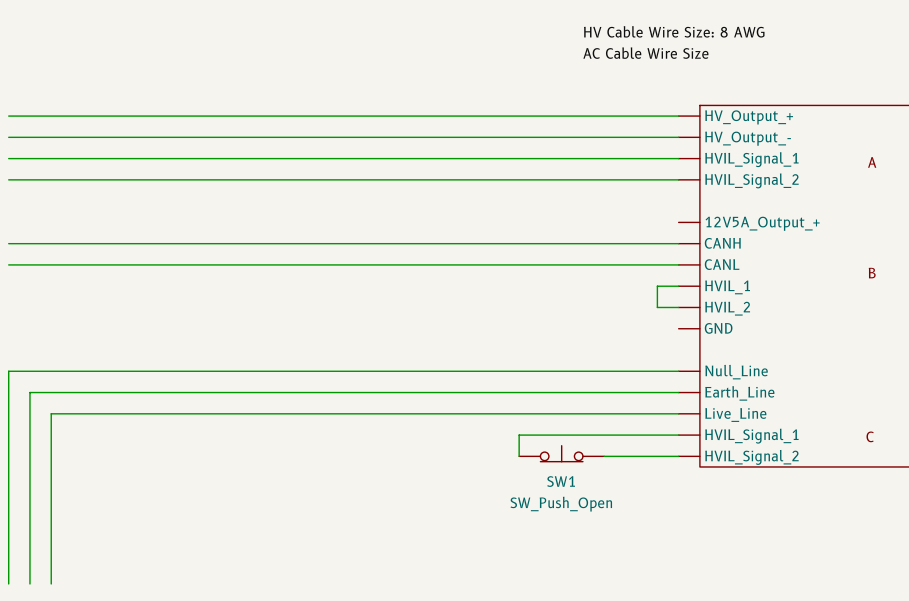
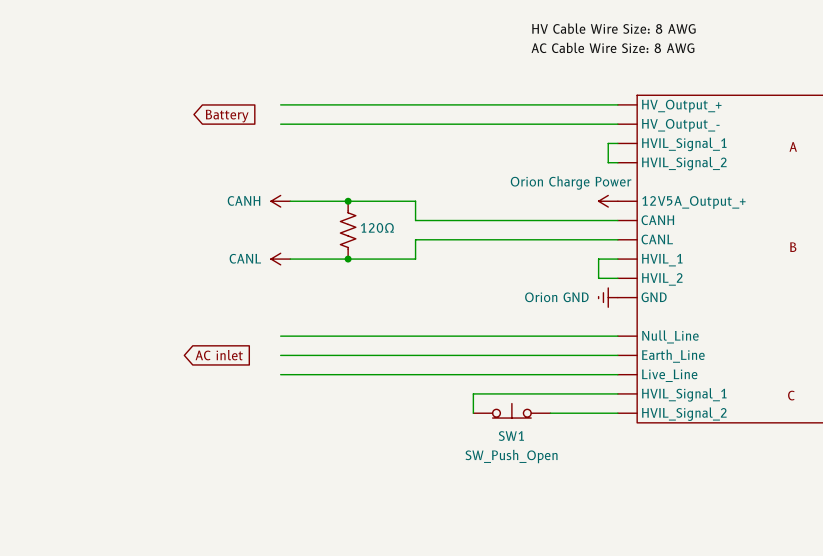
label: AC Cable Wire Size (645, 53) -> AC Cable Wire Size: 8 AWG (612, 47)
wire: (8, 116) (306, 116) -> none
global label: none -> Battery (227, 116)
wire: (8, 137) (306, 137) -> none
wire: (8, 158) (668, 158) -> (608, 162) (608, 143)
wire: (8, 179) (668, 179) -> none
power symbol: none -> CANH (280, 201)
junction: none -> (348, 201)
power symbol: none -> Orion Charge Power (608, 201)
wire: (8, 243) (455, 243) -> (290, 201) (415, 201) (415, 220)
120Ω: none -> (348, 230)
wire: (8, 264) (455, 264) -> (290, 259) (415, 259) (415, 239)
power symbol: none -> CANL (280, 259)
junction: none -> (348, 259)
power symbol: none -> Orion GND (608, 297)
wire: (306, 371) (8, 371) (8, 583) -> none
global label: none -> AC inlet (219, 355)
wire: (306, 392) (29, 392) (29, 583) -> none
wire: (306, 413) (51, 413) (51, 583) -> none

